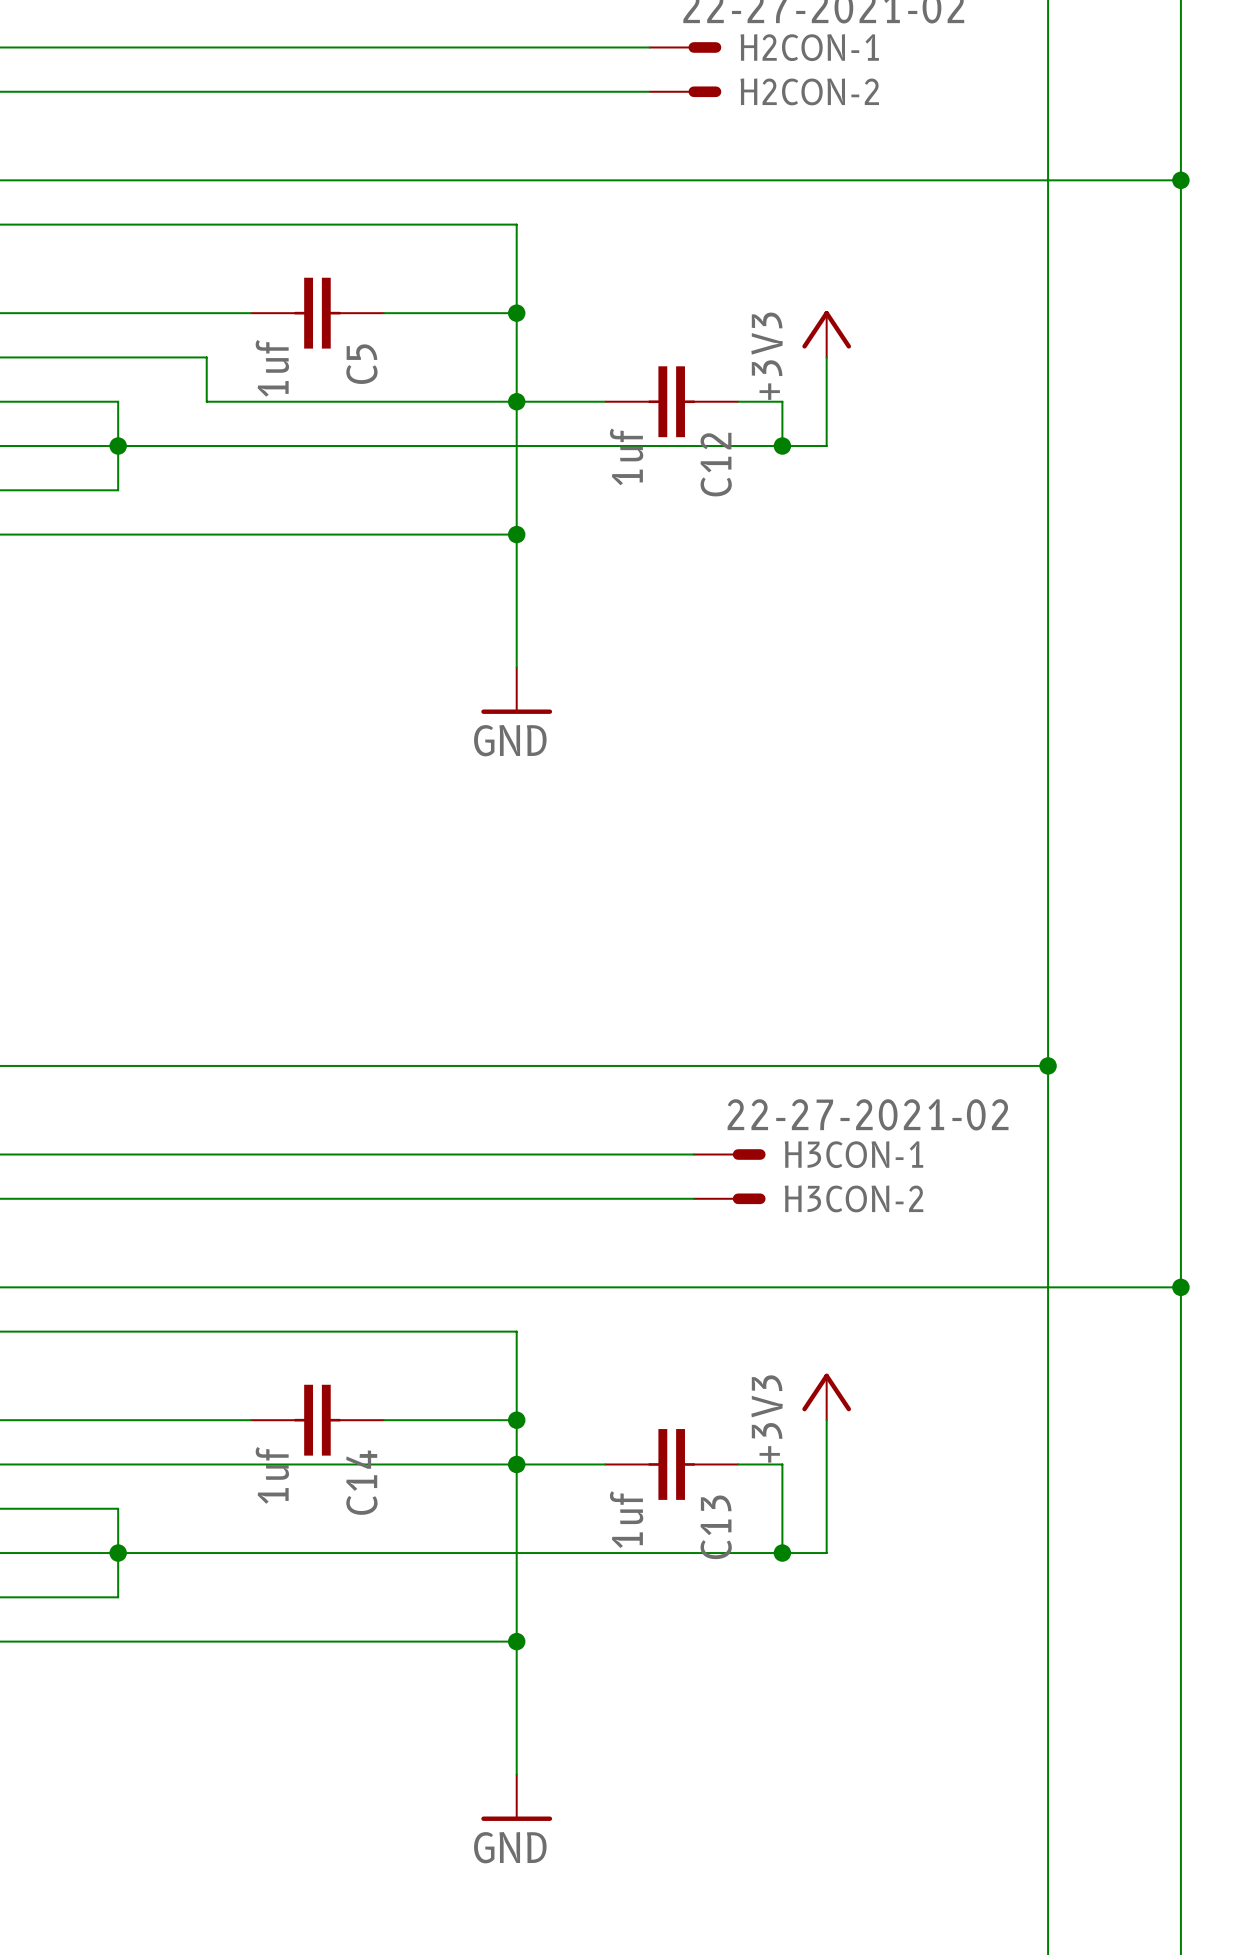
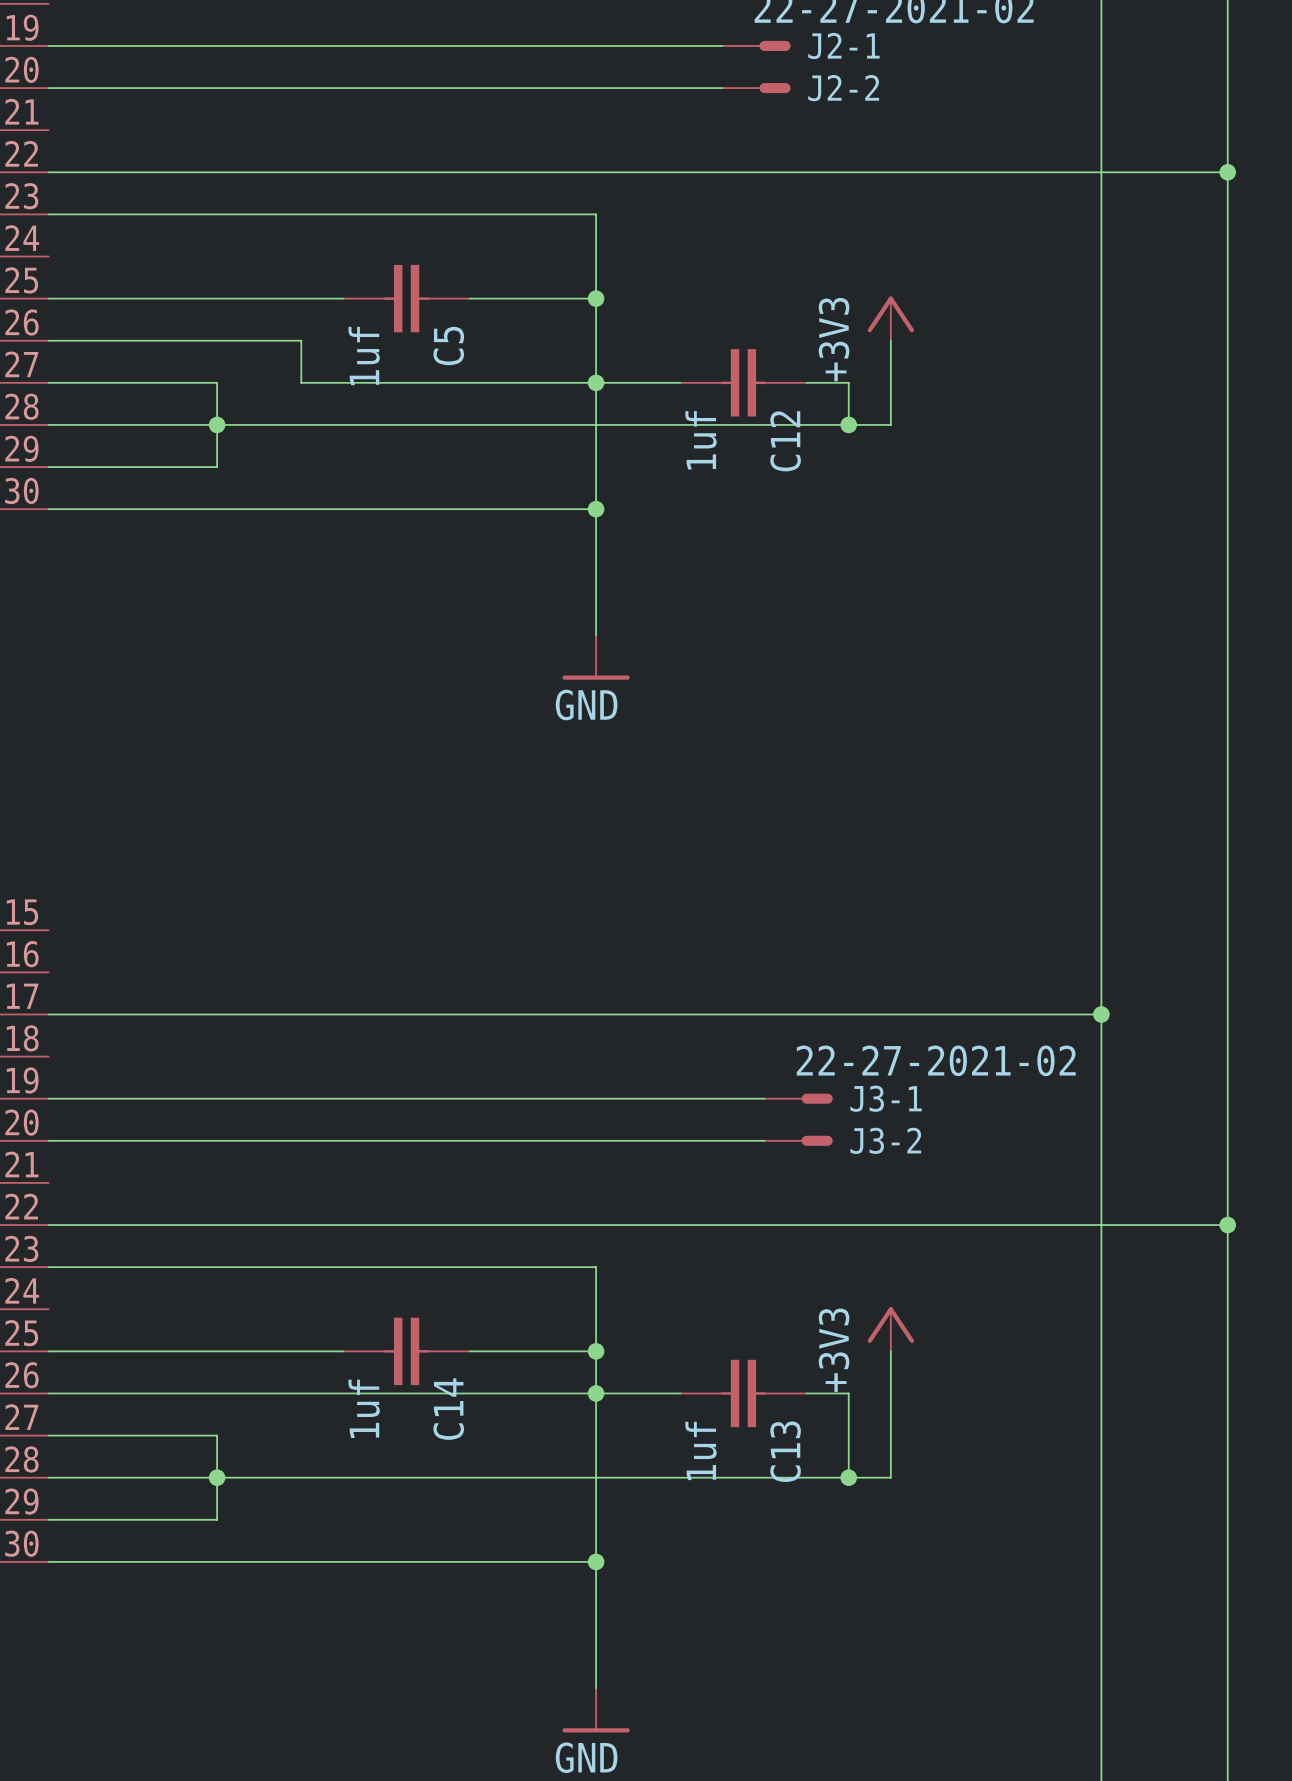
H2CON-1 name: H2CON-1 (809, 47) -> J2-1 (843, 45)
H2CON-2 name: H2CON-2 (809, 91) -> J2-2 (843, 88)
H3CON-1 name: H3CON-1 (853, 1154) -> J3-1 (886, 1098)
H3CON-2 name: H3CON-2 (854, 1198) -> J3-2 (885, 1140)

